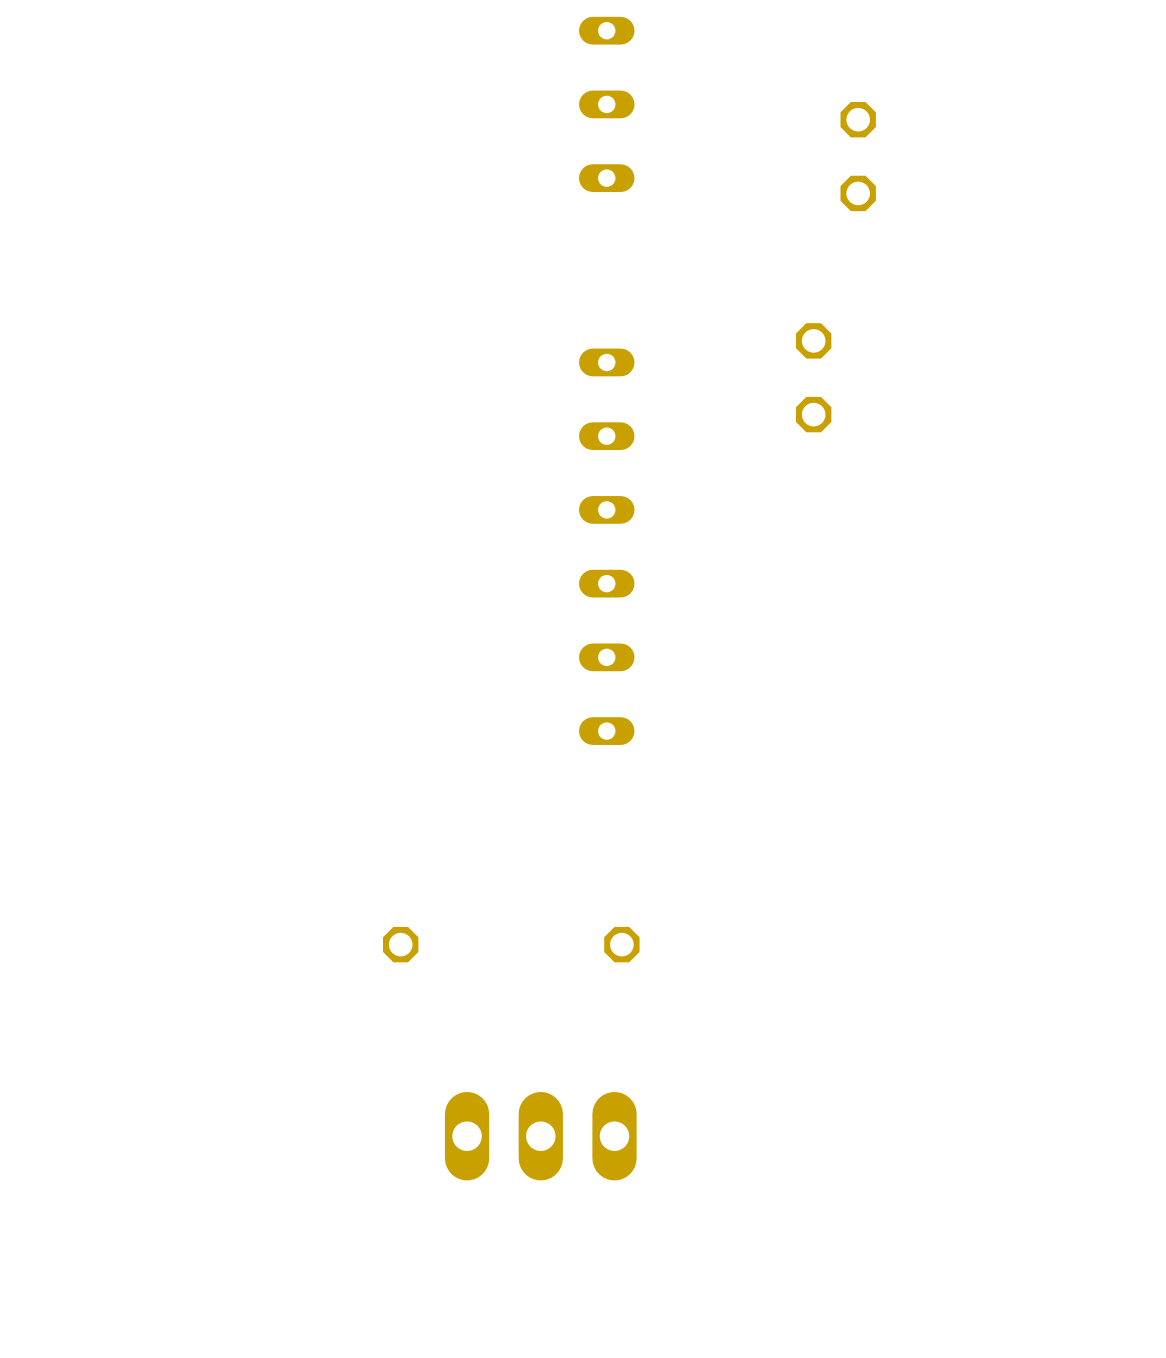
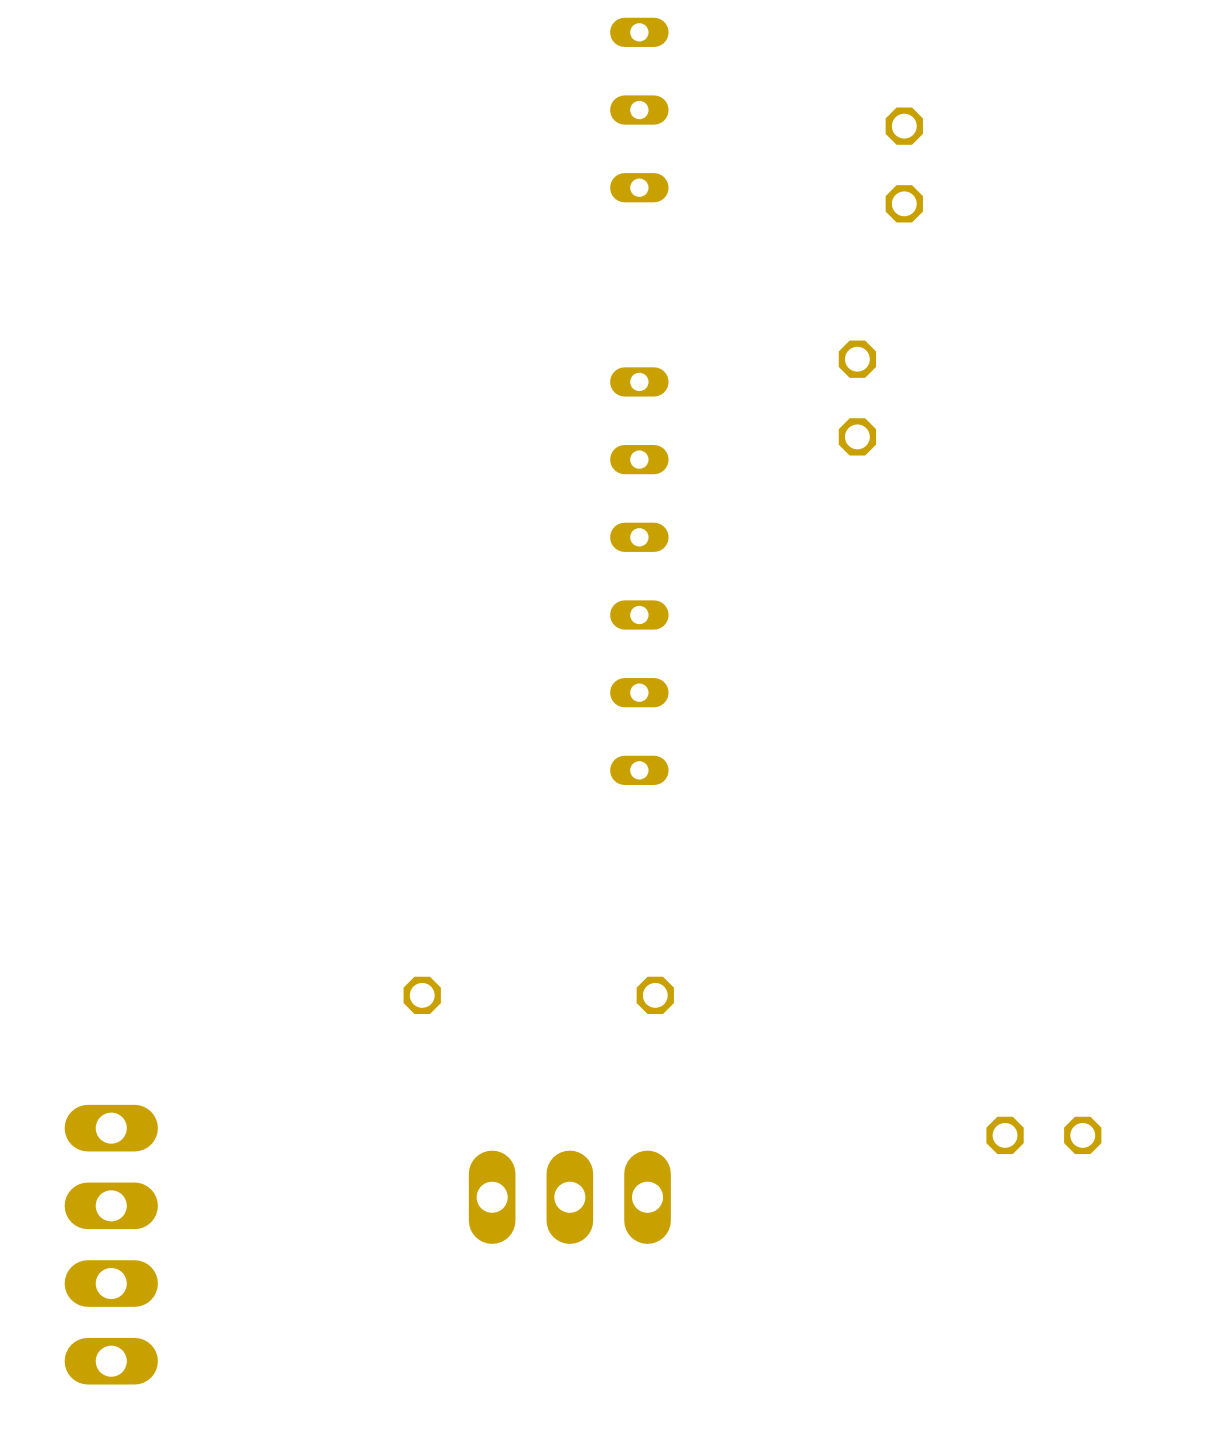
part: none -> (1043, 1135)
part: none -> (111, 1244)

